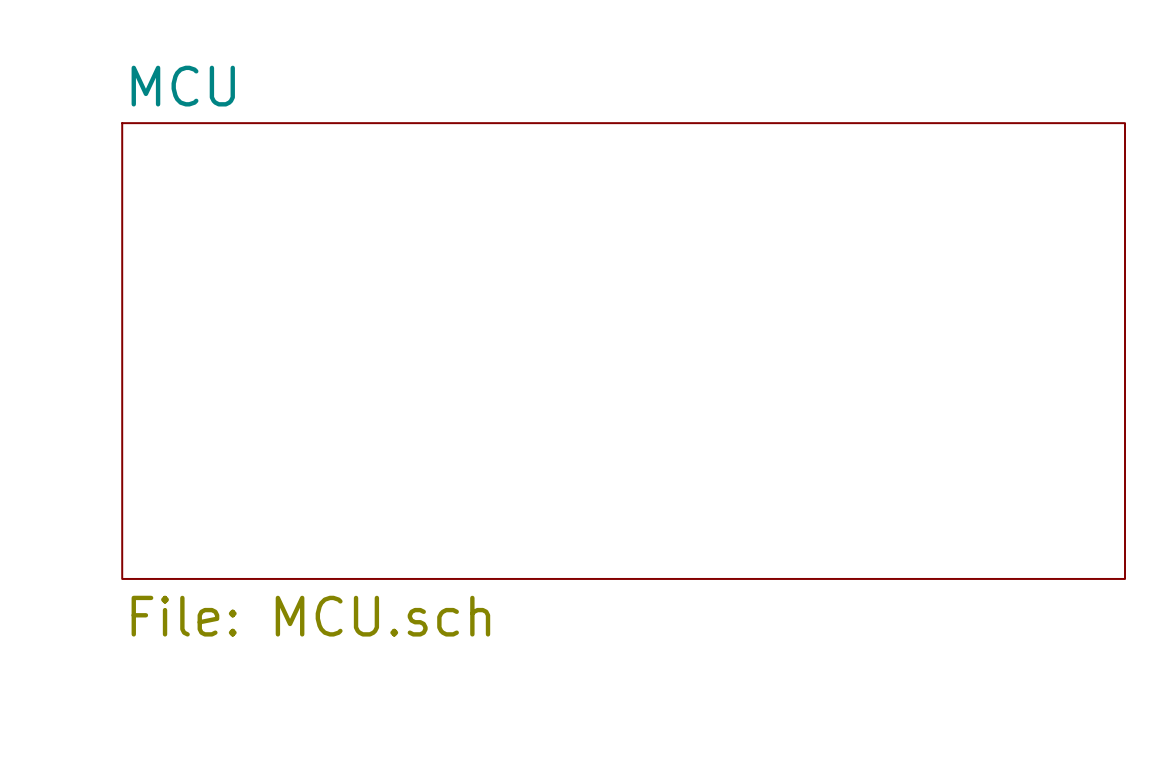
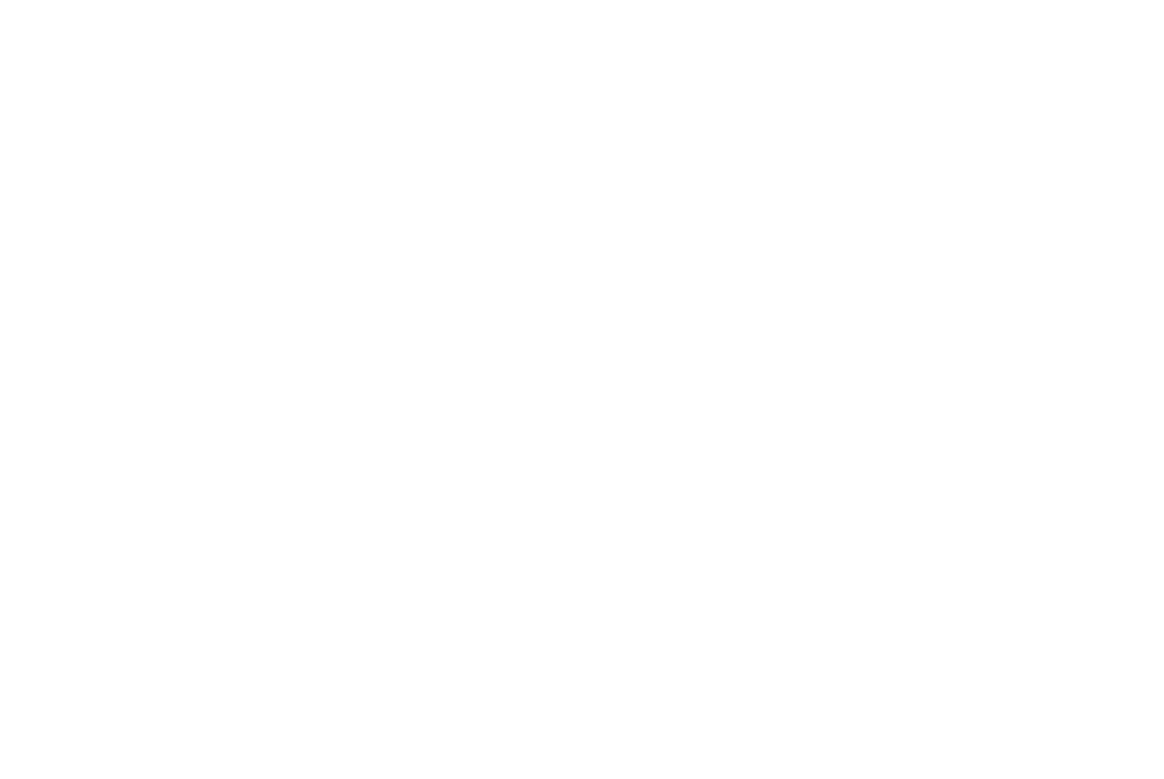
sheet MCU: File: MCU.sch (623, 351) -> none

